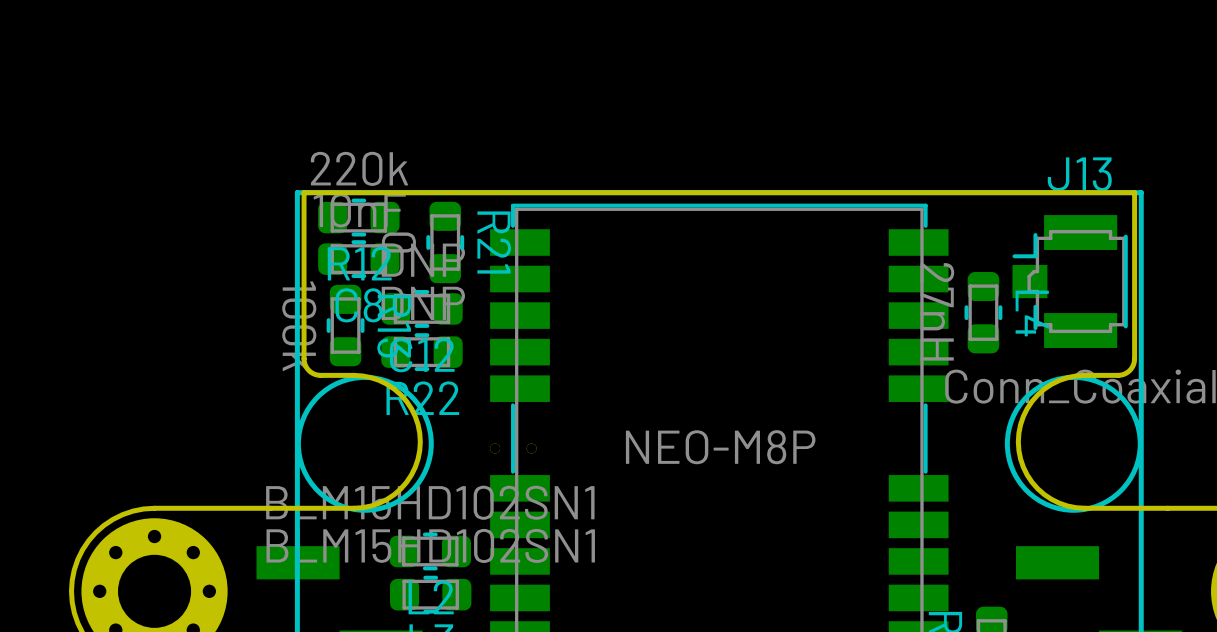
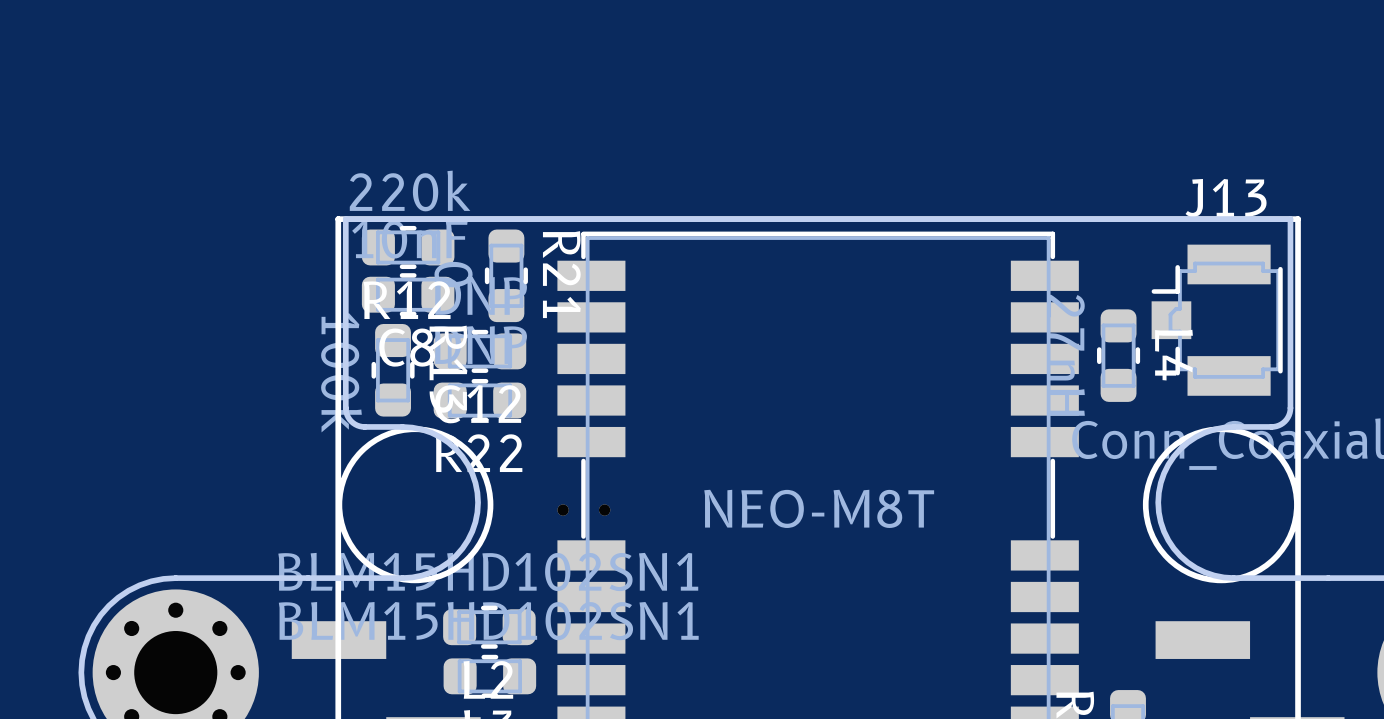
part value: NEO-M8P (720, 447) -> NEO-M8T (819, 508)

